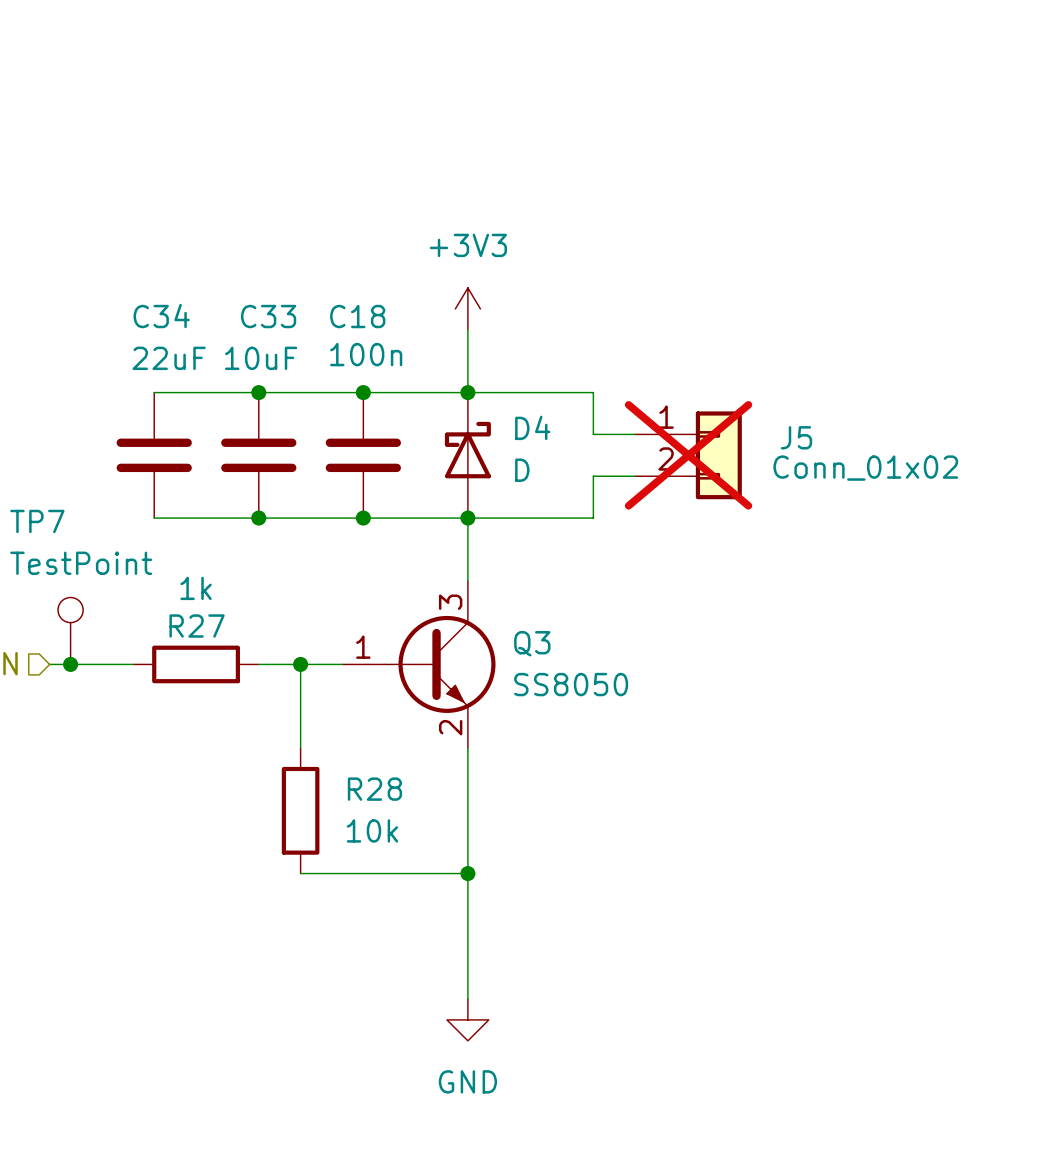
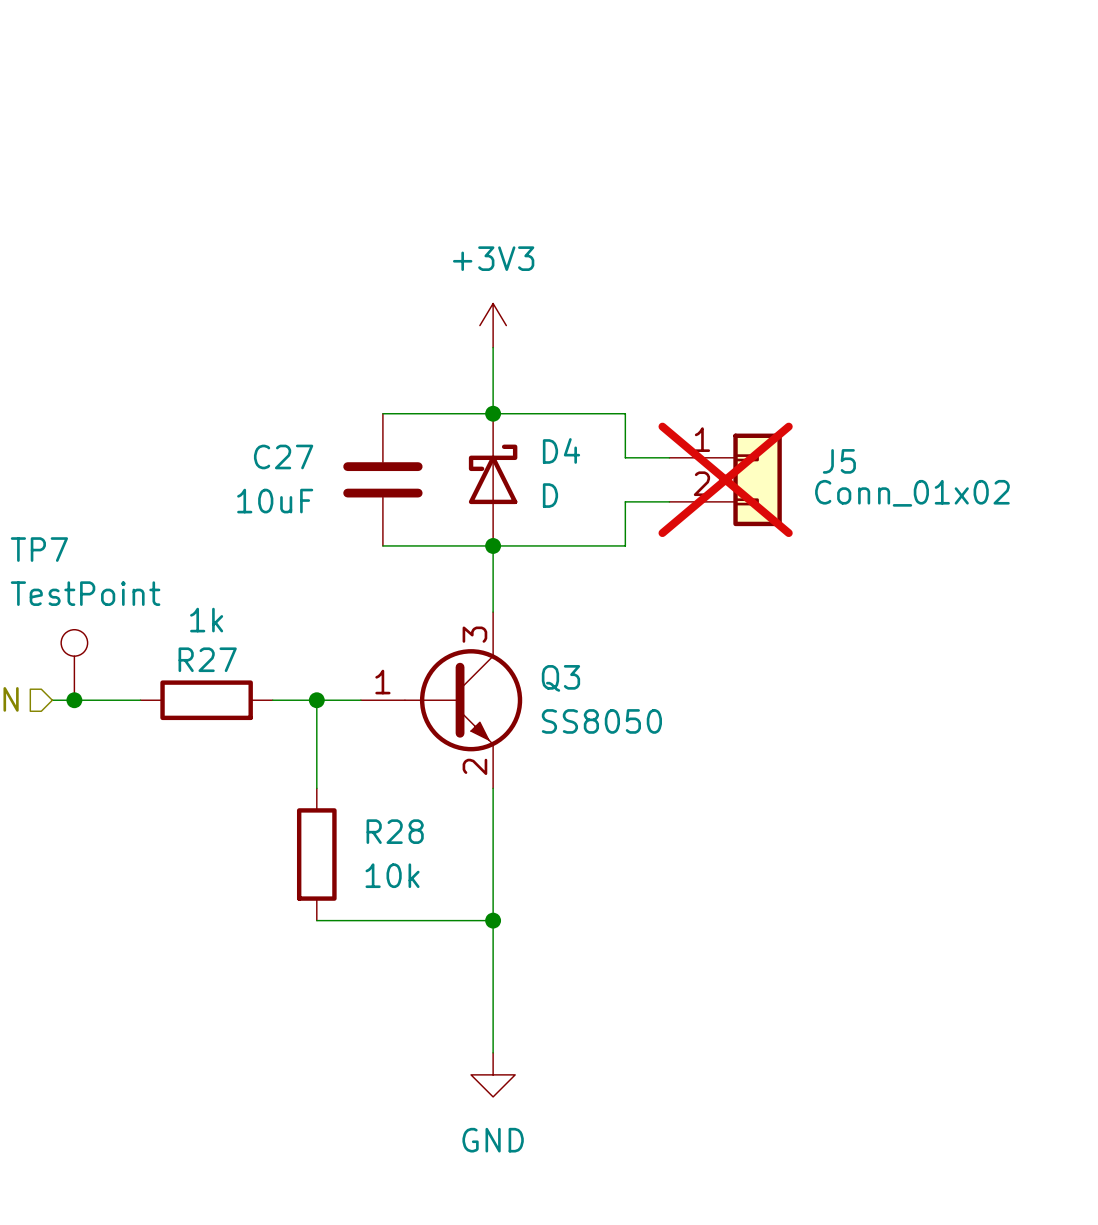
C18 name: C18 (357, 316) -> C27 (283, 456)
C18 value: 100n (366, 354) -> 10uF (275, 501)
wire: (154, 392) (363, 392) -> none
junction: (258, 392) -> none
junction: (363, 392) -> none
C34: 22uF (154, 455) -> none
C33: 10uF (258, 455) -> none
wire: (154, 518) (363, 518) -> none
junction: (258, 518) -> none
junction: (363, 518) -> none

